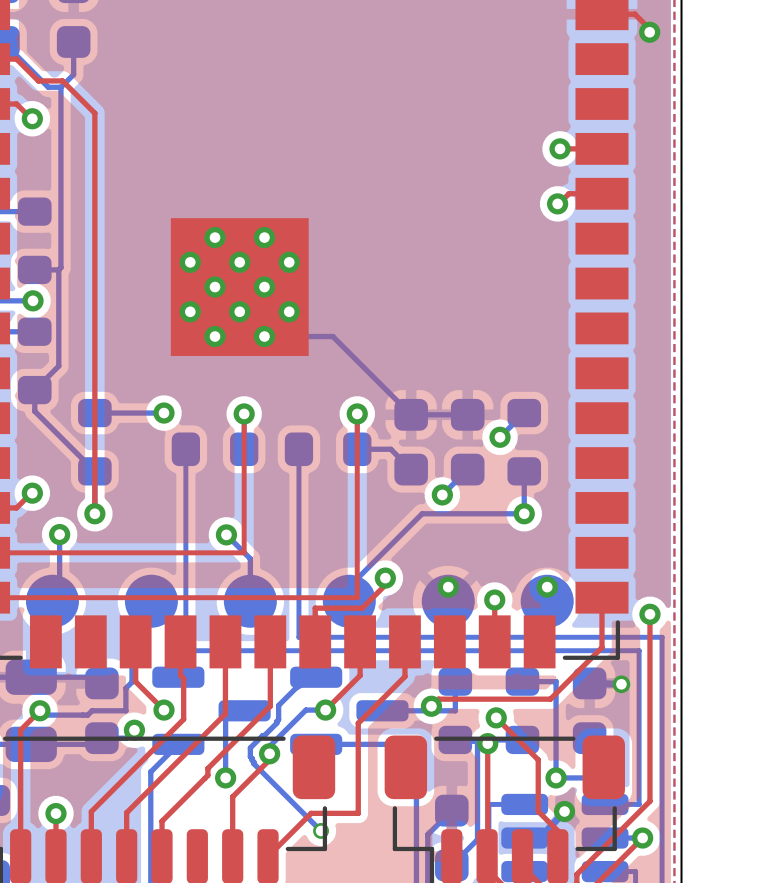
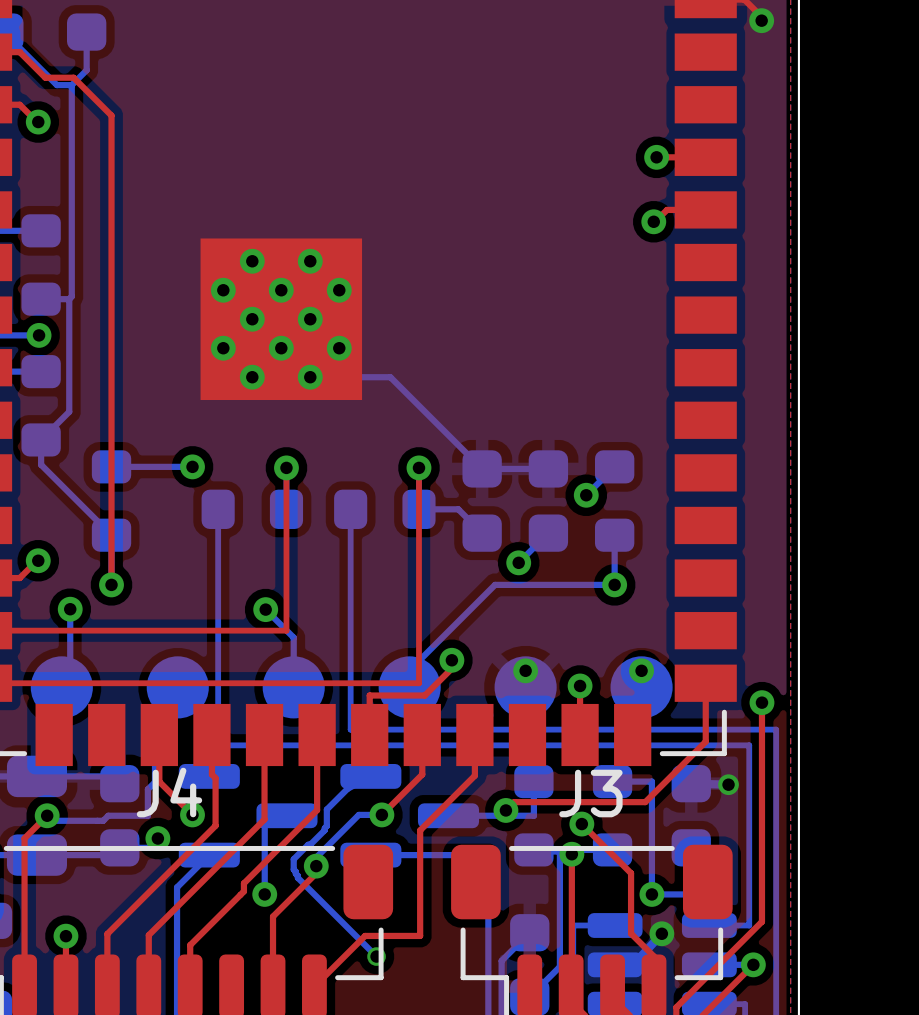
J3 name: none -> J3 (590, 793)
J4 name: none -> J4 (169, 792)

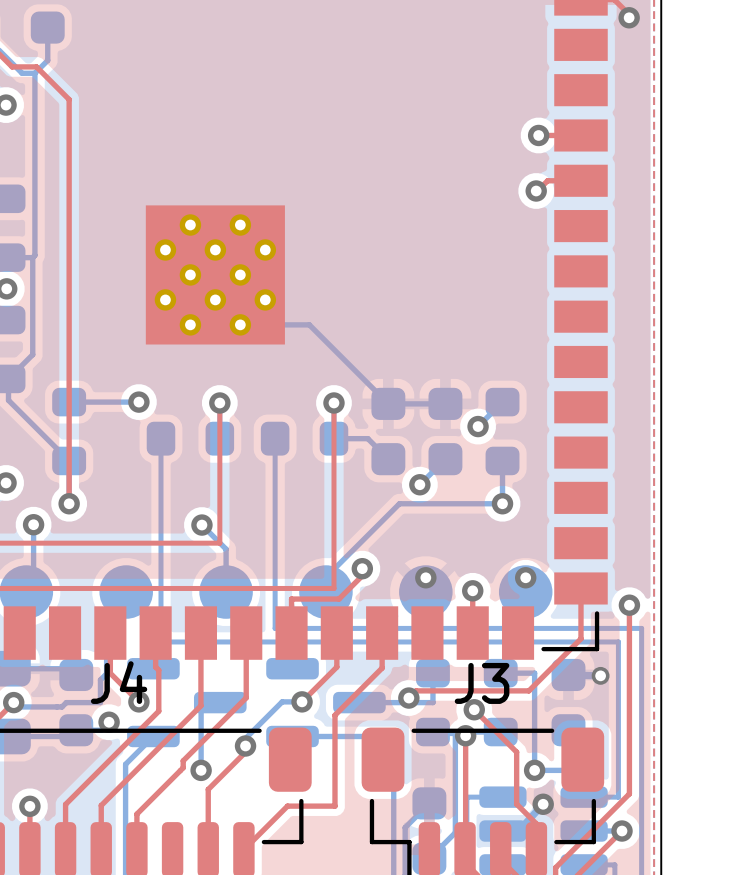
bottom track: (370, 776) (347, 788) (326, 809) (326, 826) (324, 830) (293, 859) (293, 869) (297, 877) (376, 956) -> none
via: (376, 956) -> none

